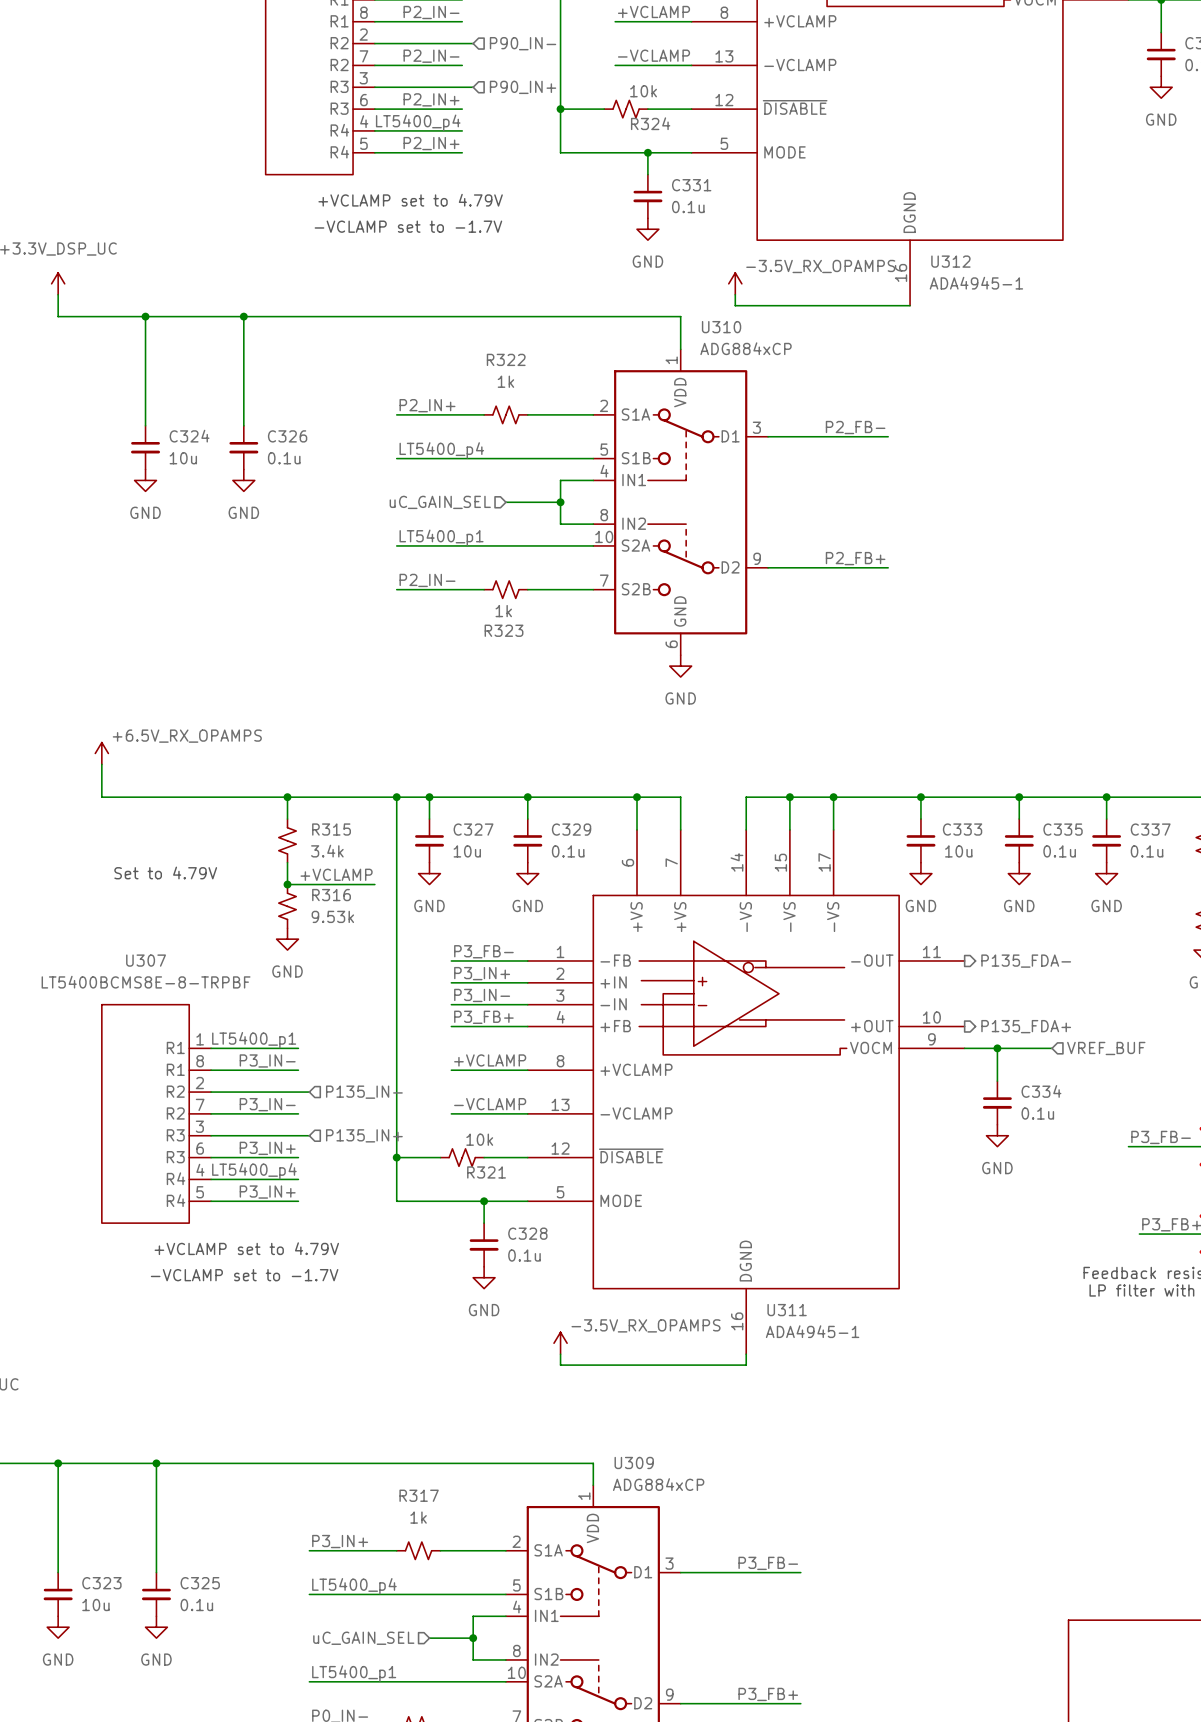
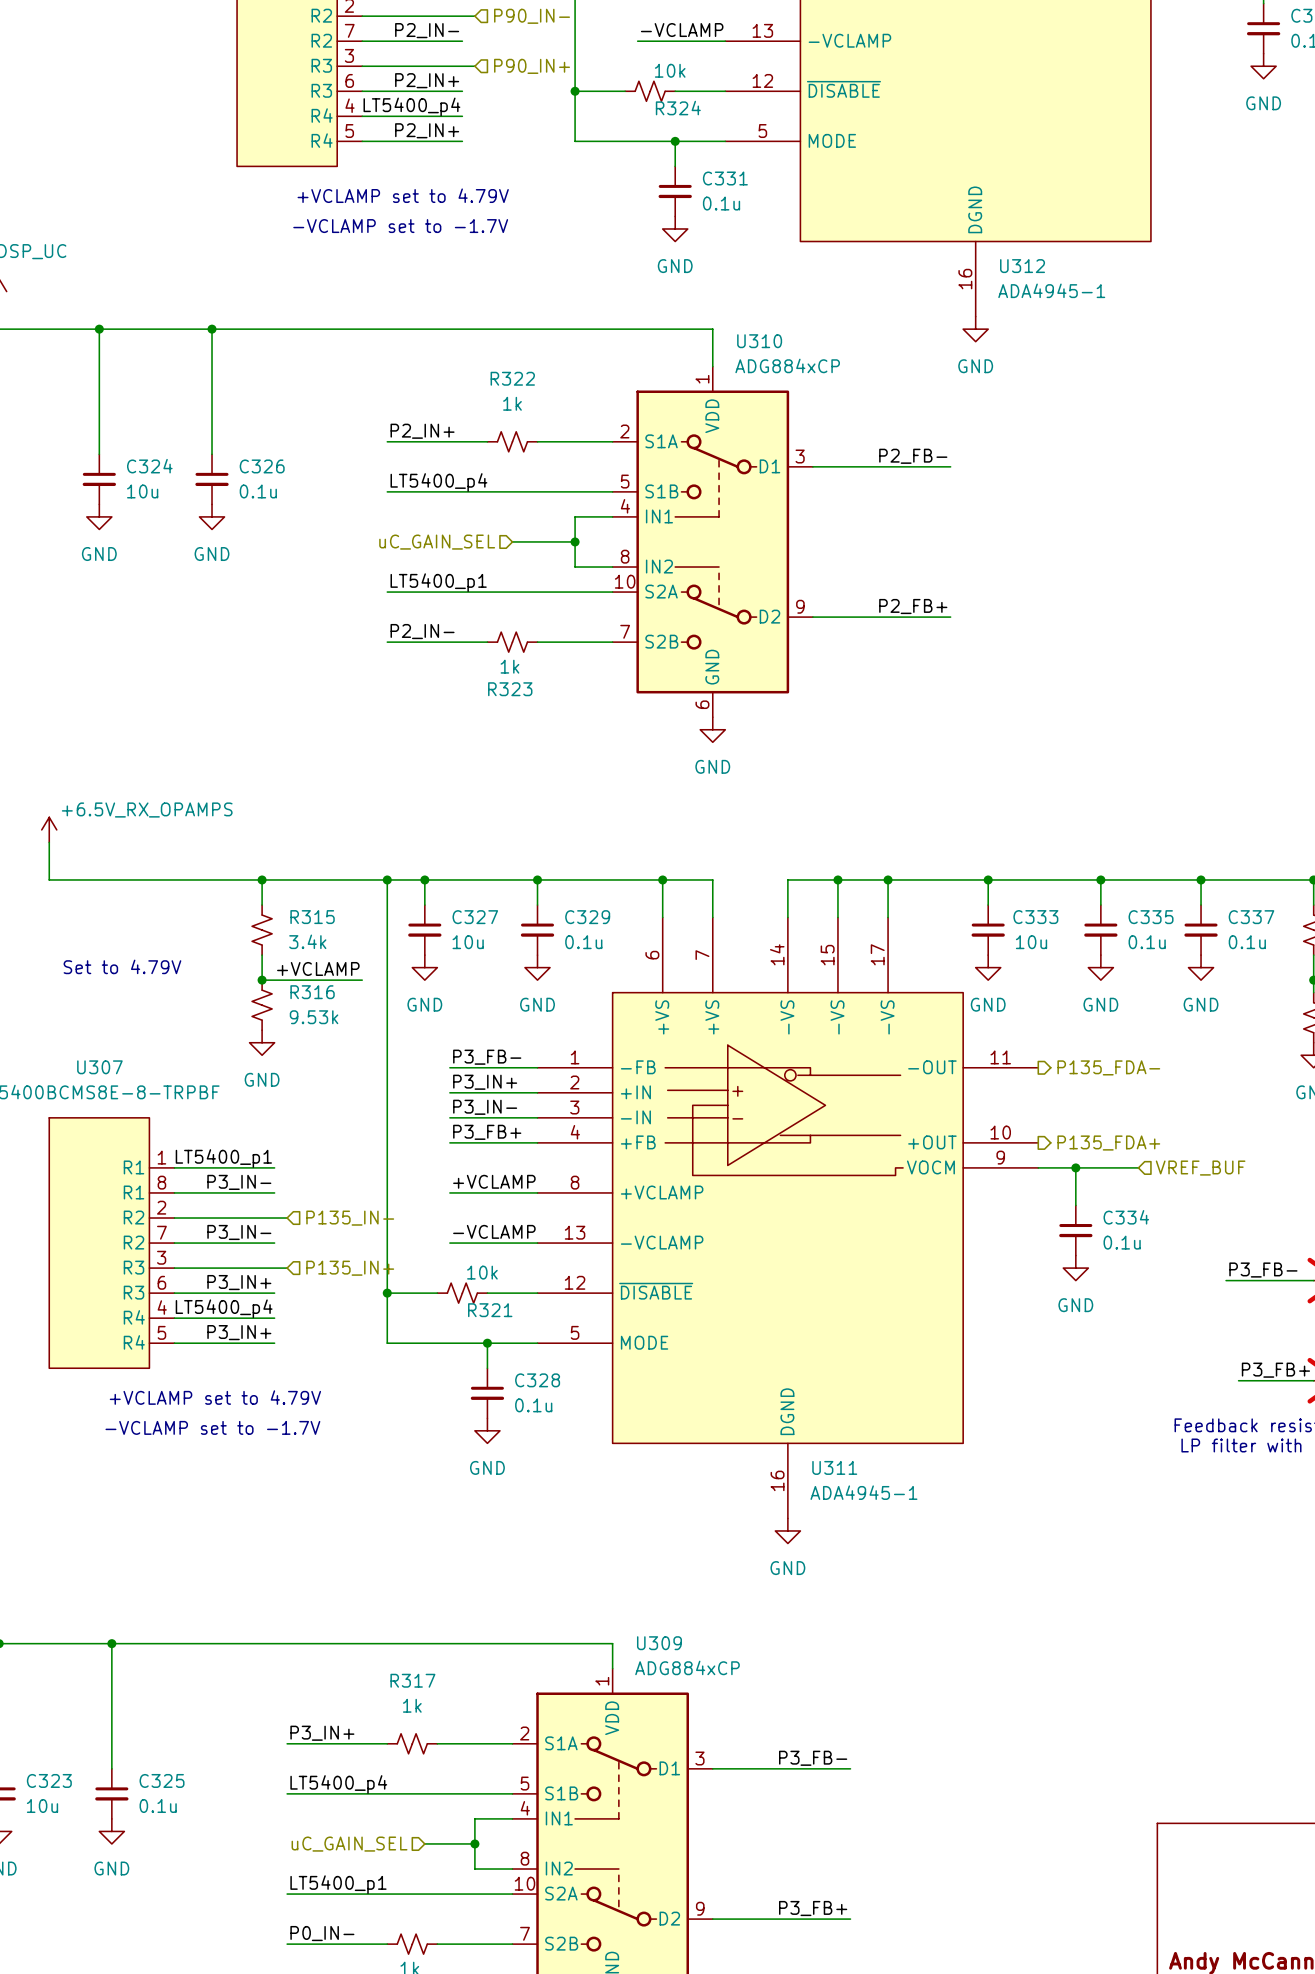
power symbol: -3.5V_RX_OPAMPS (735, 283) -> none
wire: (735, 294) (735, 305) (910, 305) -> none
power symbol: none -> GND (975, 329)
power symbol: -3.5V_RX_OPAMPS (560, 1343) -> none
wire: (560, 1354) (560, 1365) (746, 1365) (746, 1354) -> none
power symbol: none -> GND (787, 1530)

